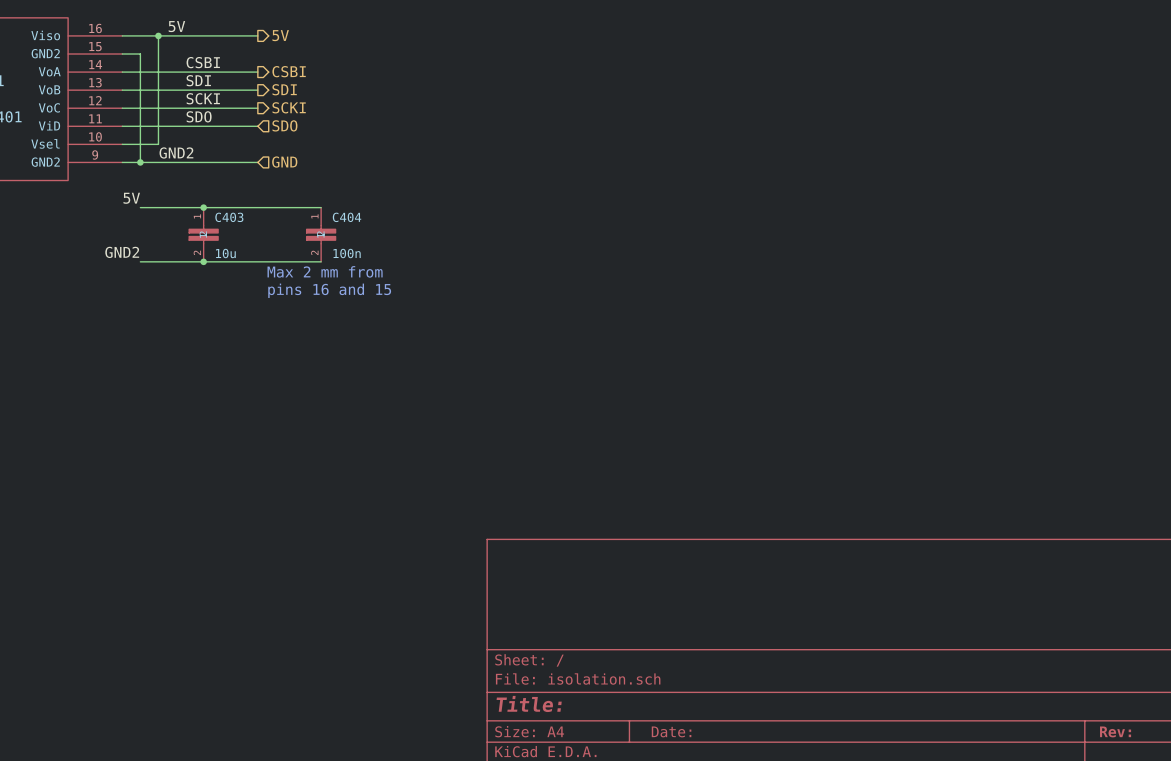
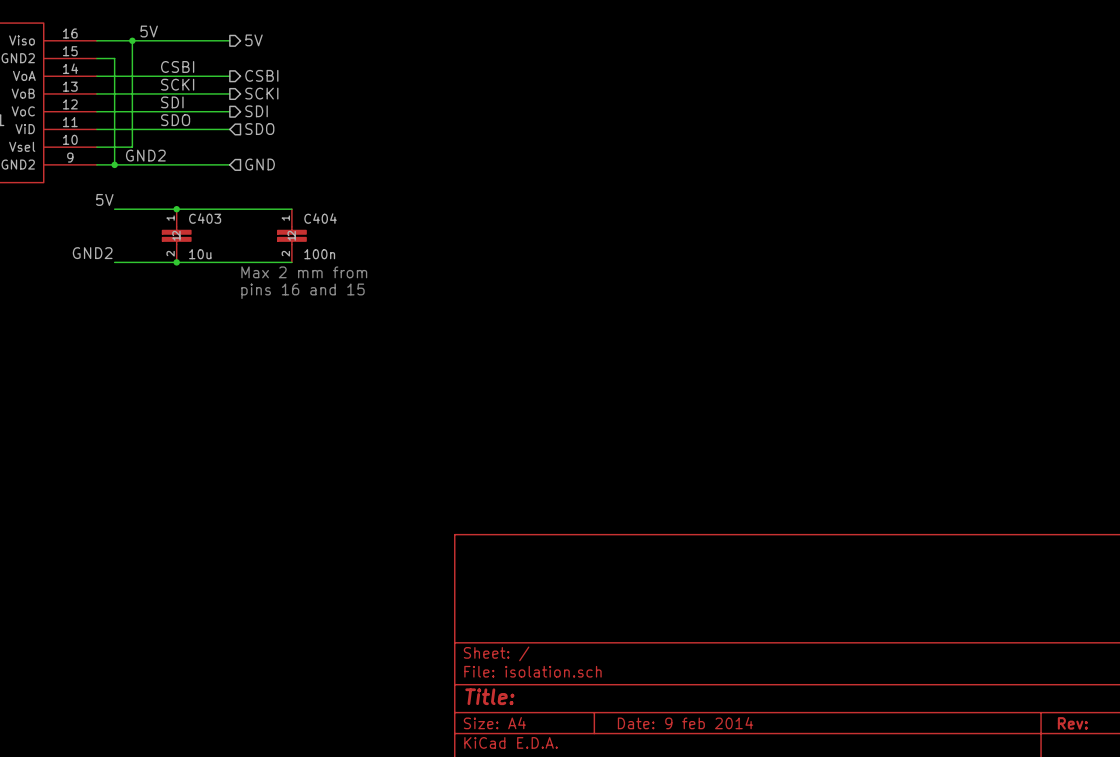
label: SDI (198, 80) -> SCKI (177, 84)
hierarchical label: SDI (284, 89) -> SCKI (261, 93)
label: SCKI (203, 98) -> SDI (172, 102)
hierarchical label: SCKI (289, 107) -> SDI (256, 111)
title block: Date: (671, 731) -> Date: 9 feb 2014 (685, 723)

